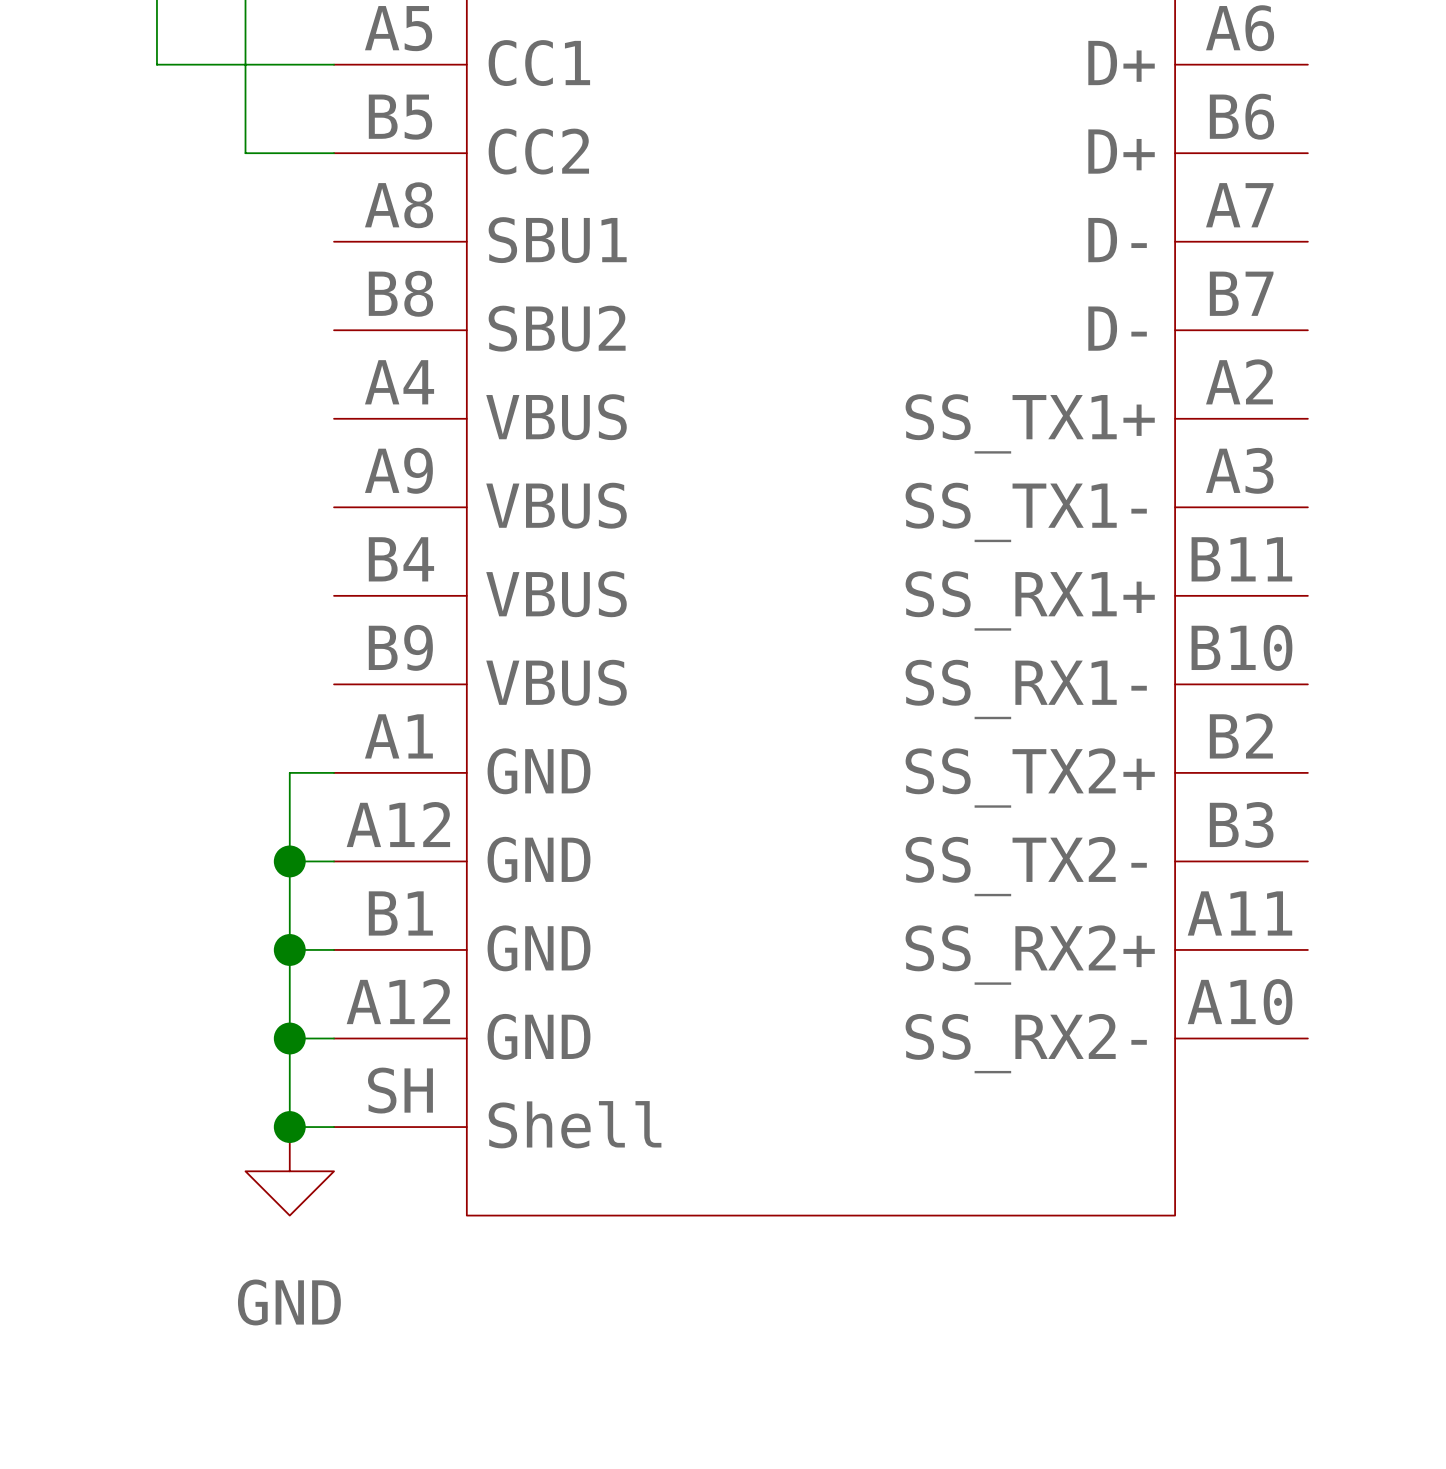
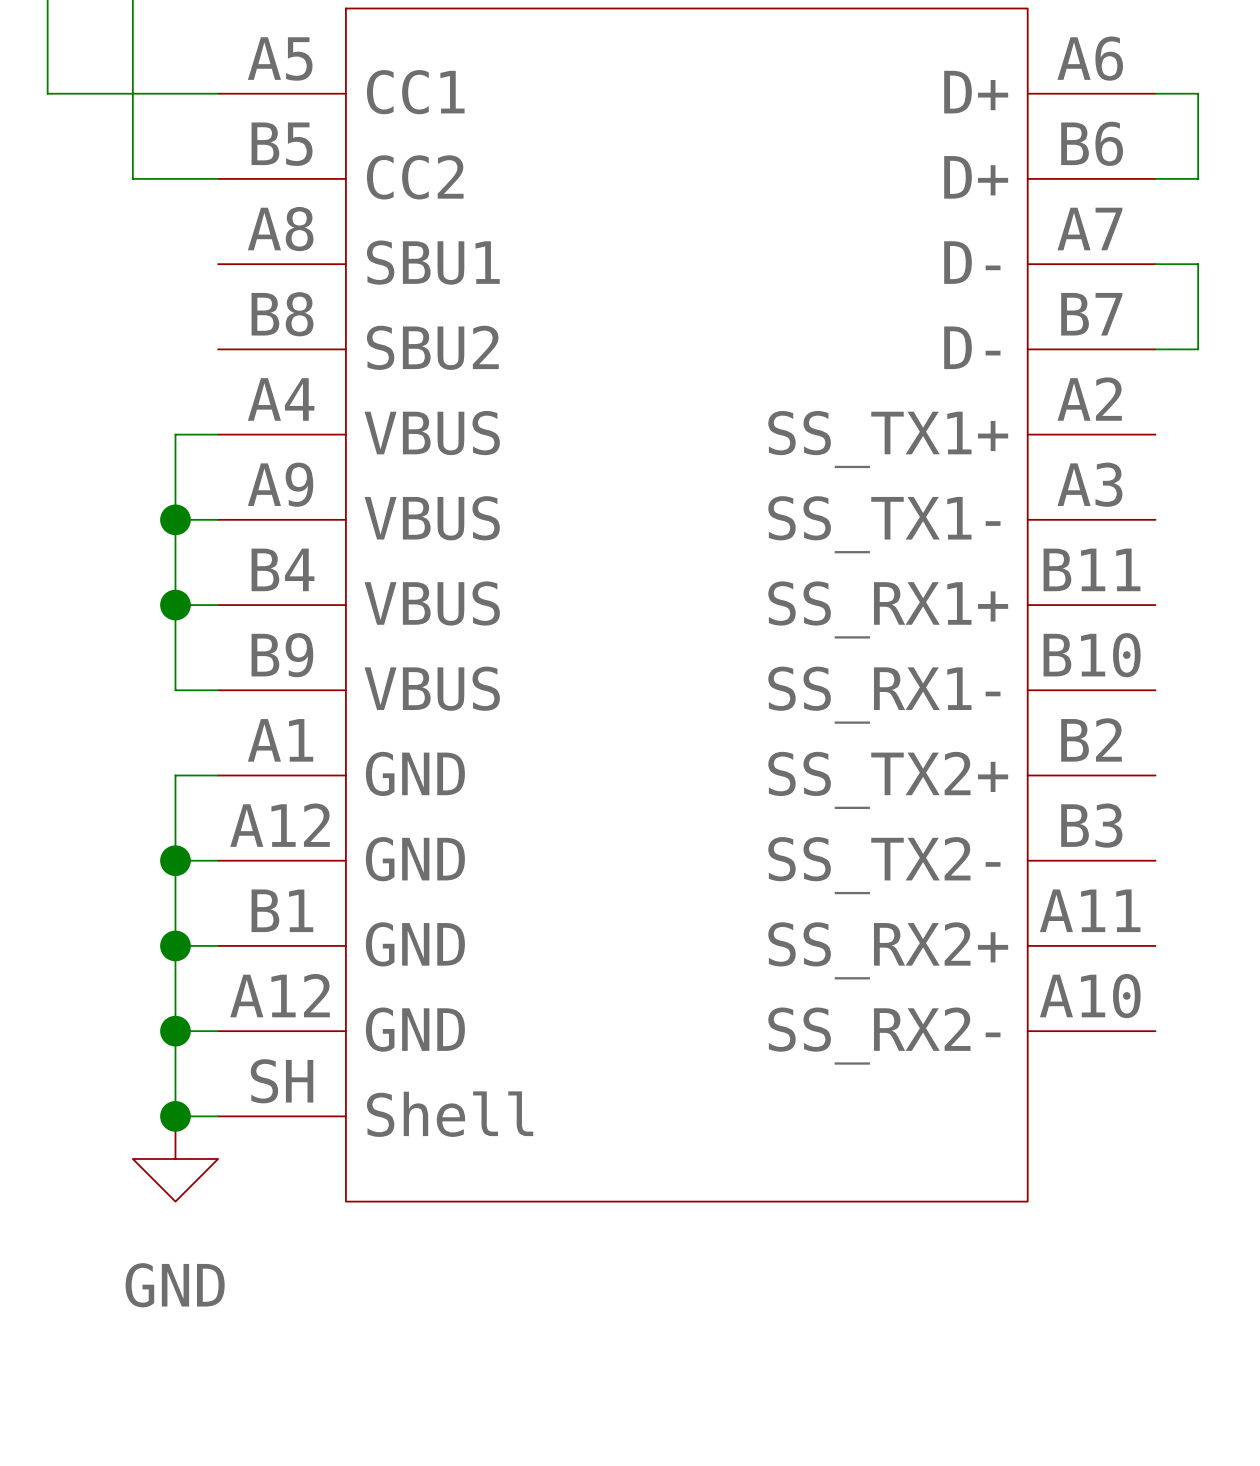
wire: none -> (1155, 93) (1198, 93) (1198, 178) (1155, 178)
wire: none -> (1155, 264) (1198, 264) (1198, 349) (1155, 349)
wire: none -> (218, 434) (175, 434) (175, 690) (218, 690)
wire: none -> (175, 519) (218, 519)
junction: none -> (175, 519)
wire: none -> (175, 605) (218, 605)
junction: none -> (175, 605)

